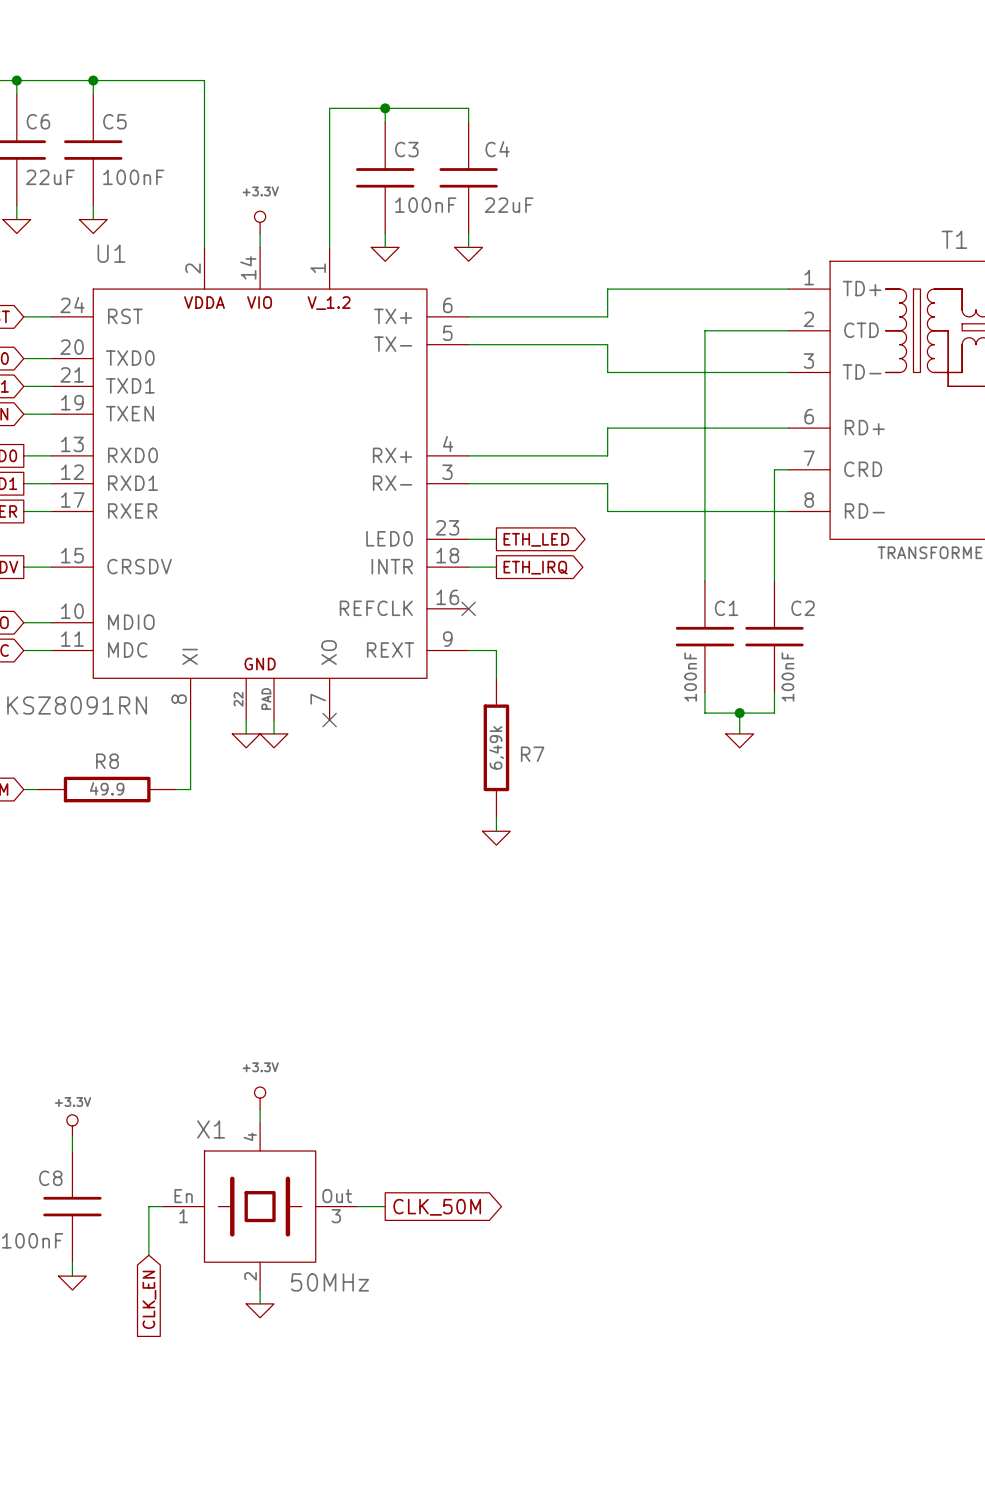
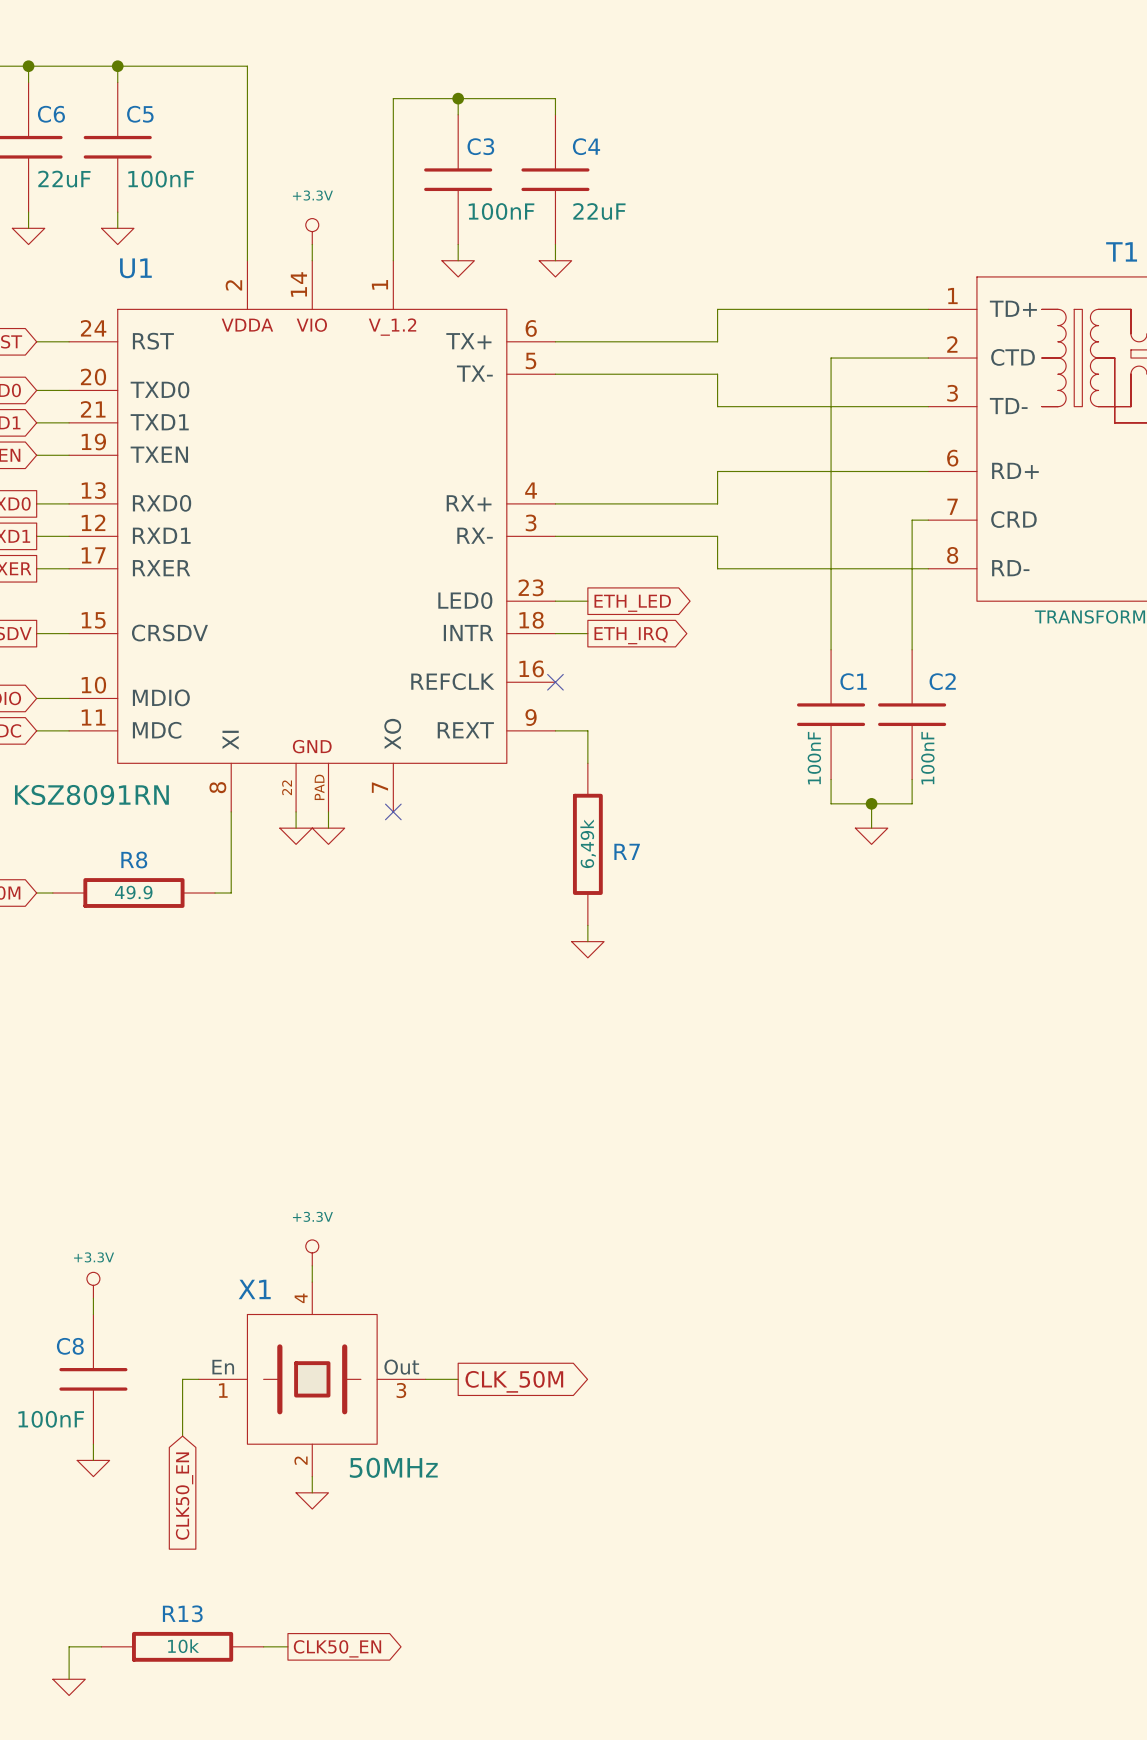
global label: CLK_EN (149, 1299) -> CLK50_EN (184, 1496)
wire: none -> (101, 1646) (69, 1646) (69, 1679)
R13: none -> 10k (182, 1646)
wire: none -> (263, 1646) (287, 1646)
global label: none -> CLK50_EN (337, 1648)
power symbol: none -> (69, 1687)

